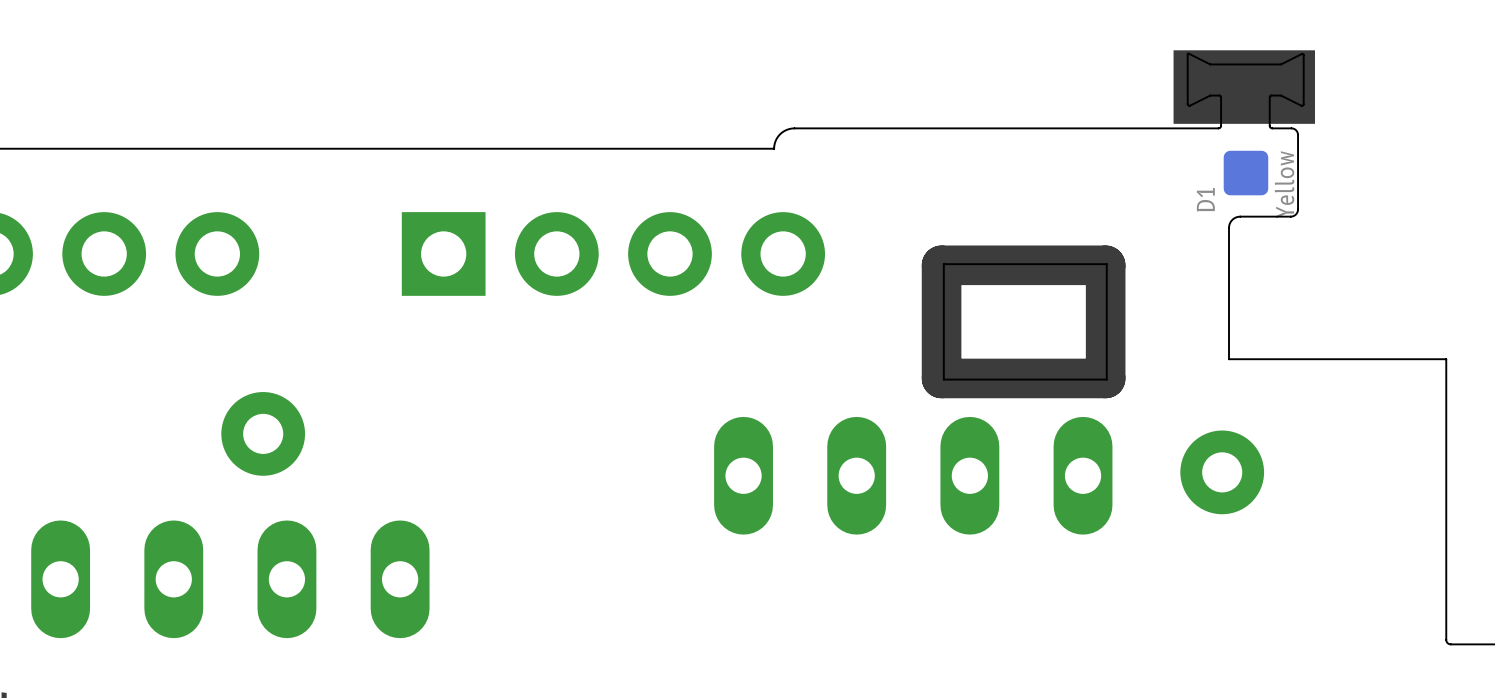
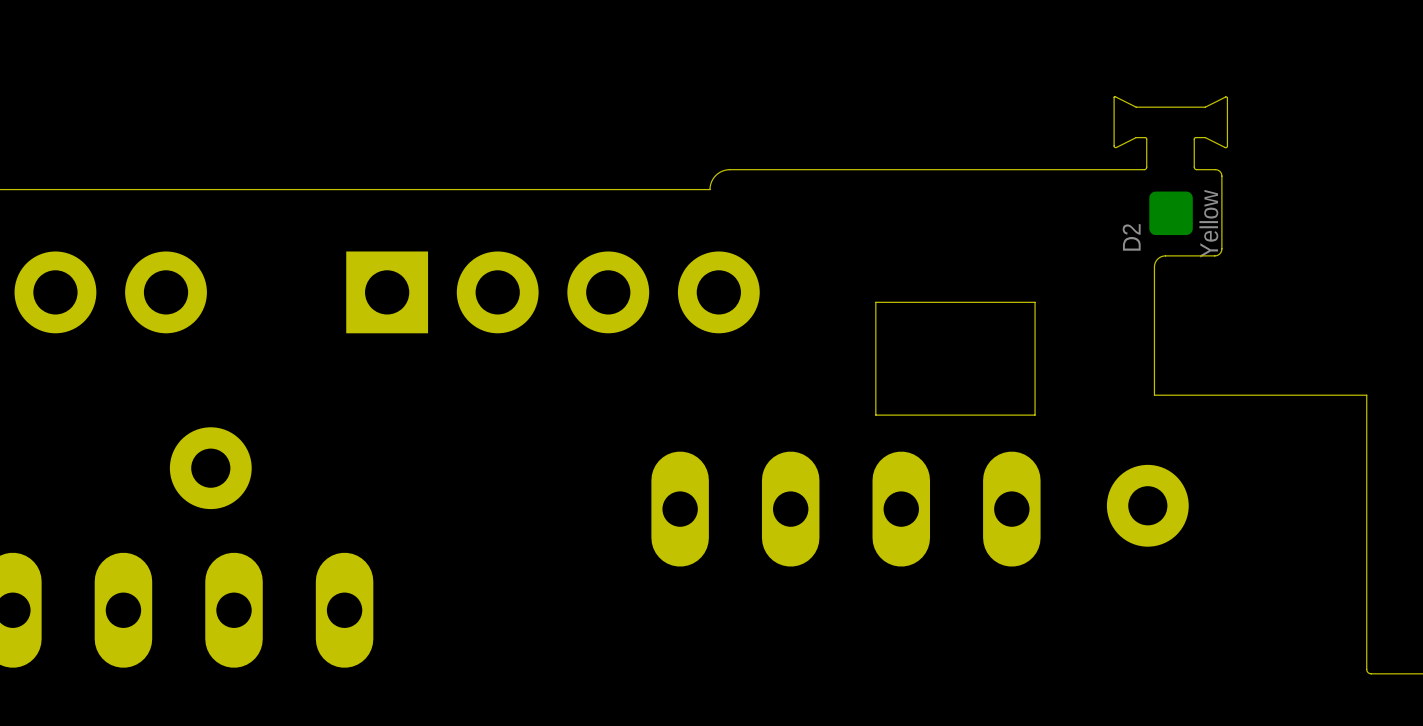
drawing: [1173, 50, 1316, 124] -> none
D1 name: D1 (1205, 199) -> D2 (1131, 237)
line: (1105, 265) (1105, 378) (941, 378) (941, 265) (1105, 265) -> none

